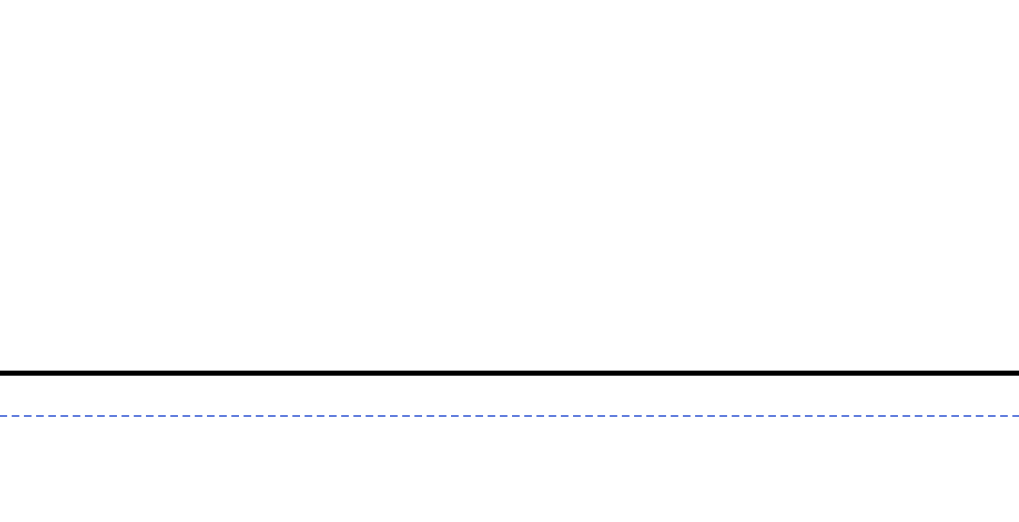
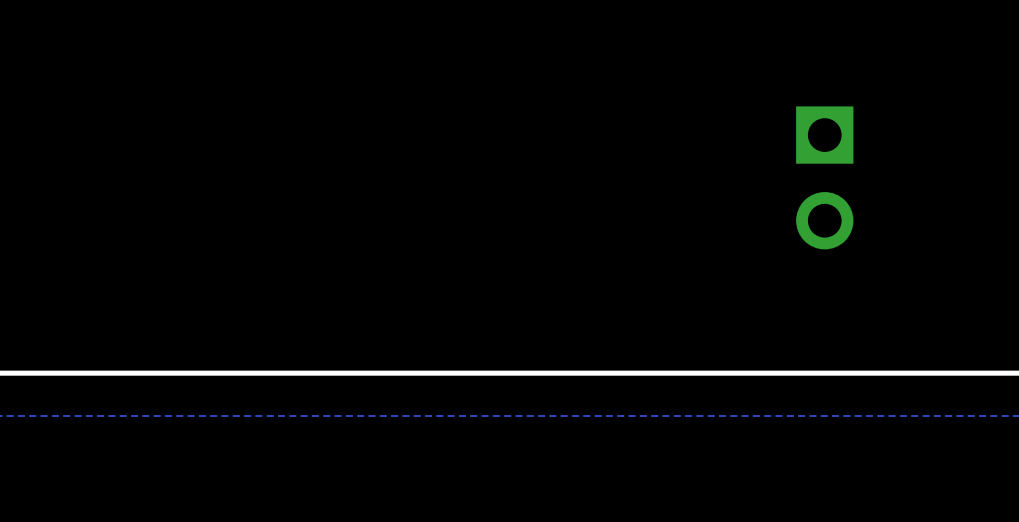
part: none -> (824, 177)

